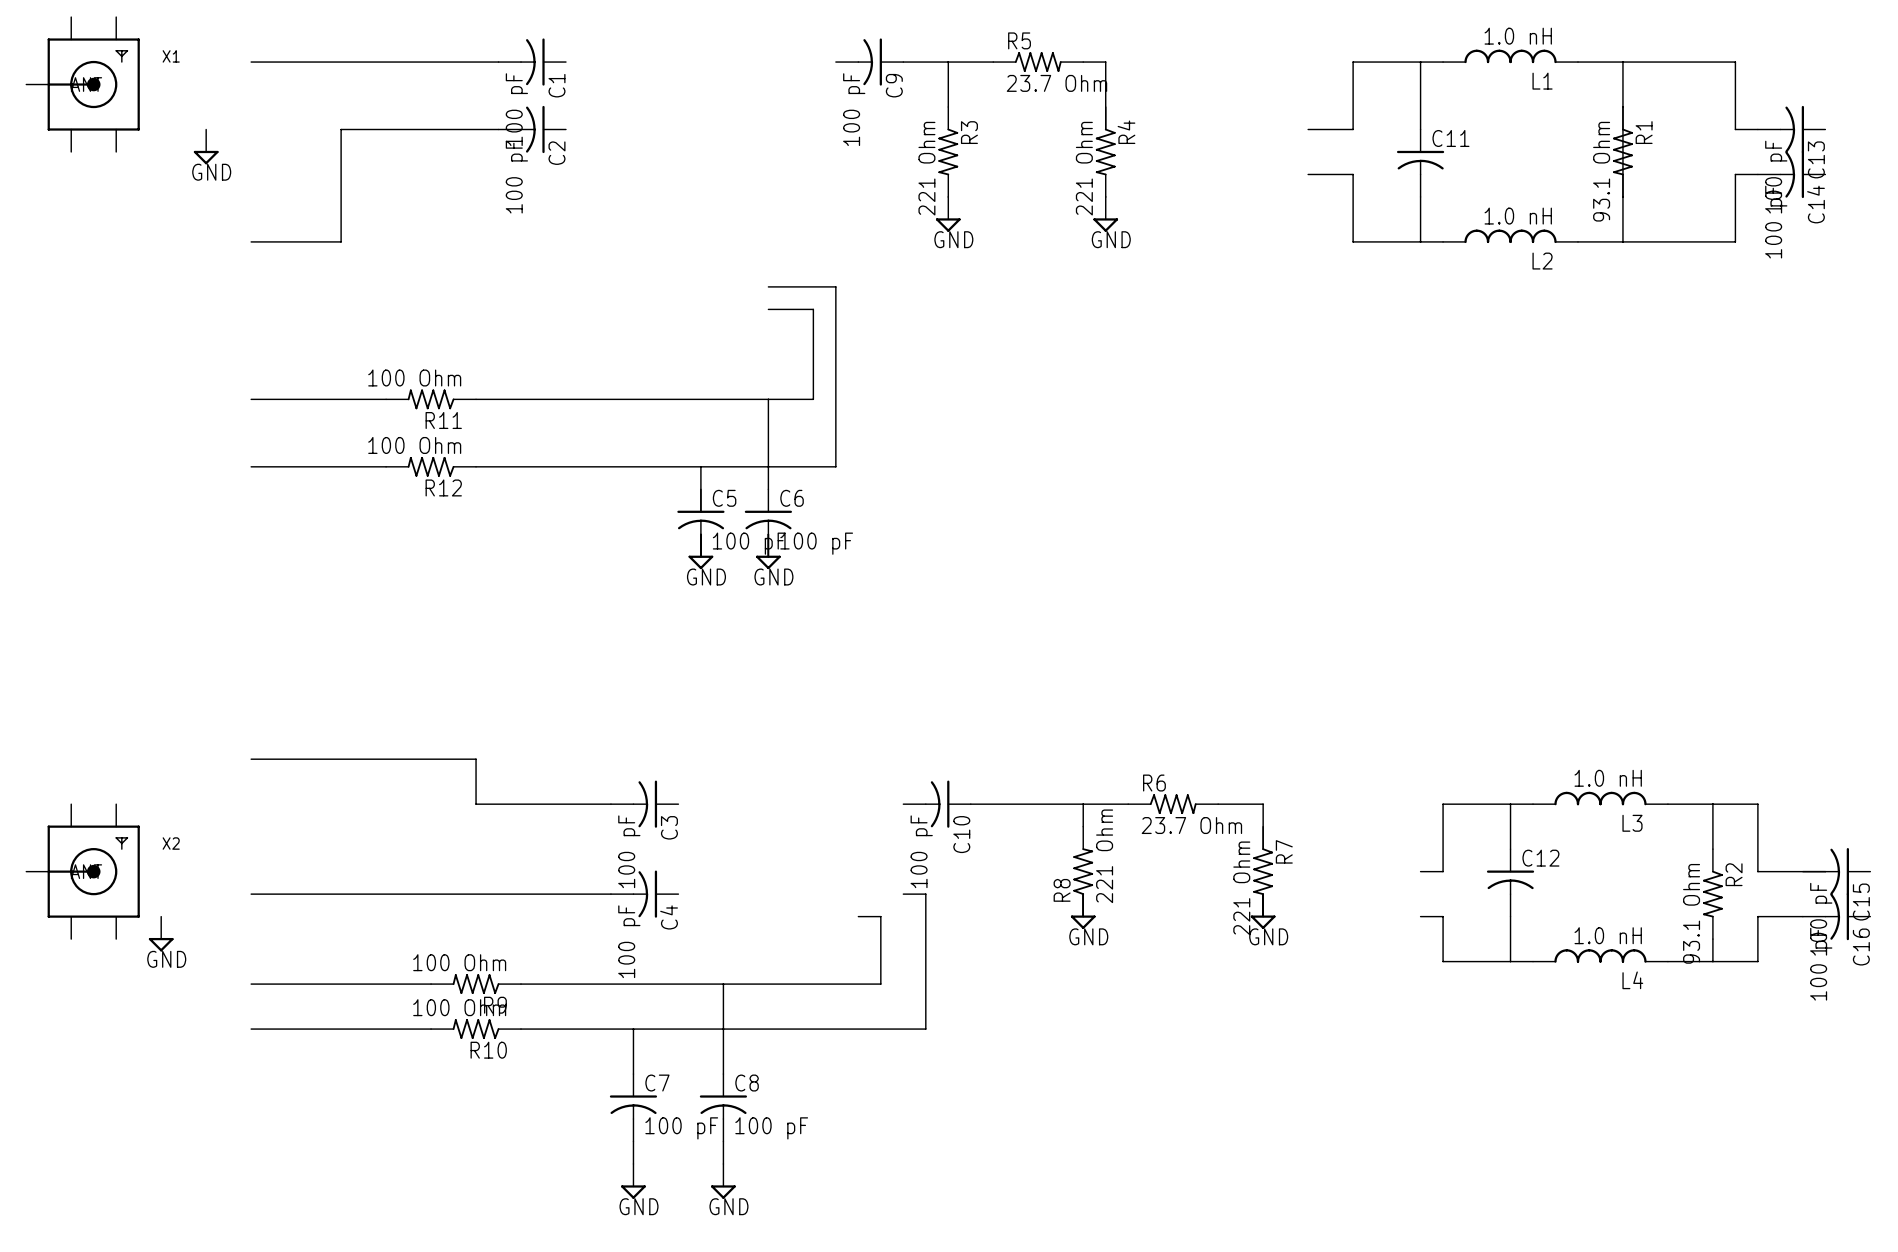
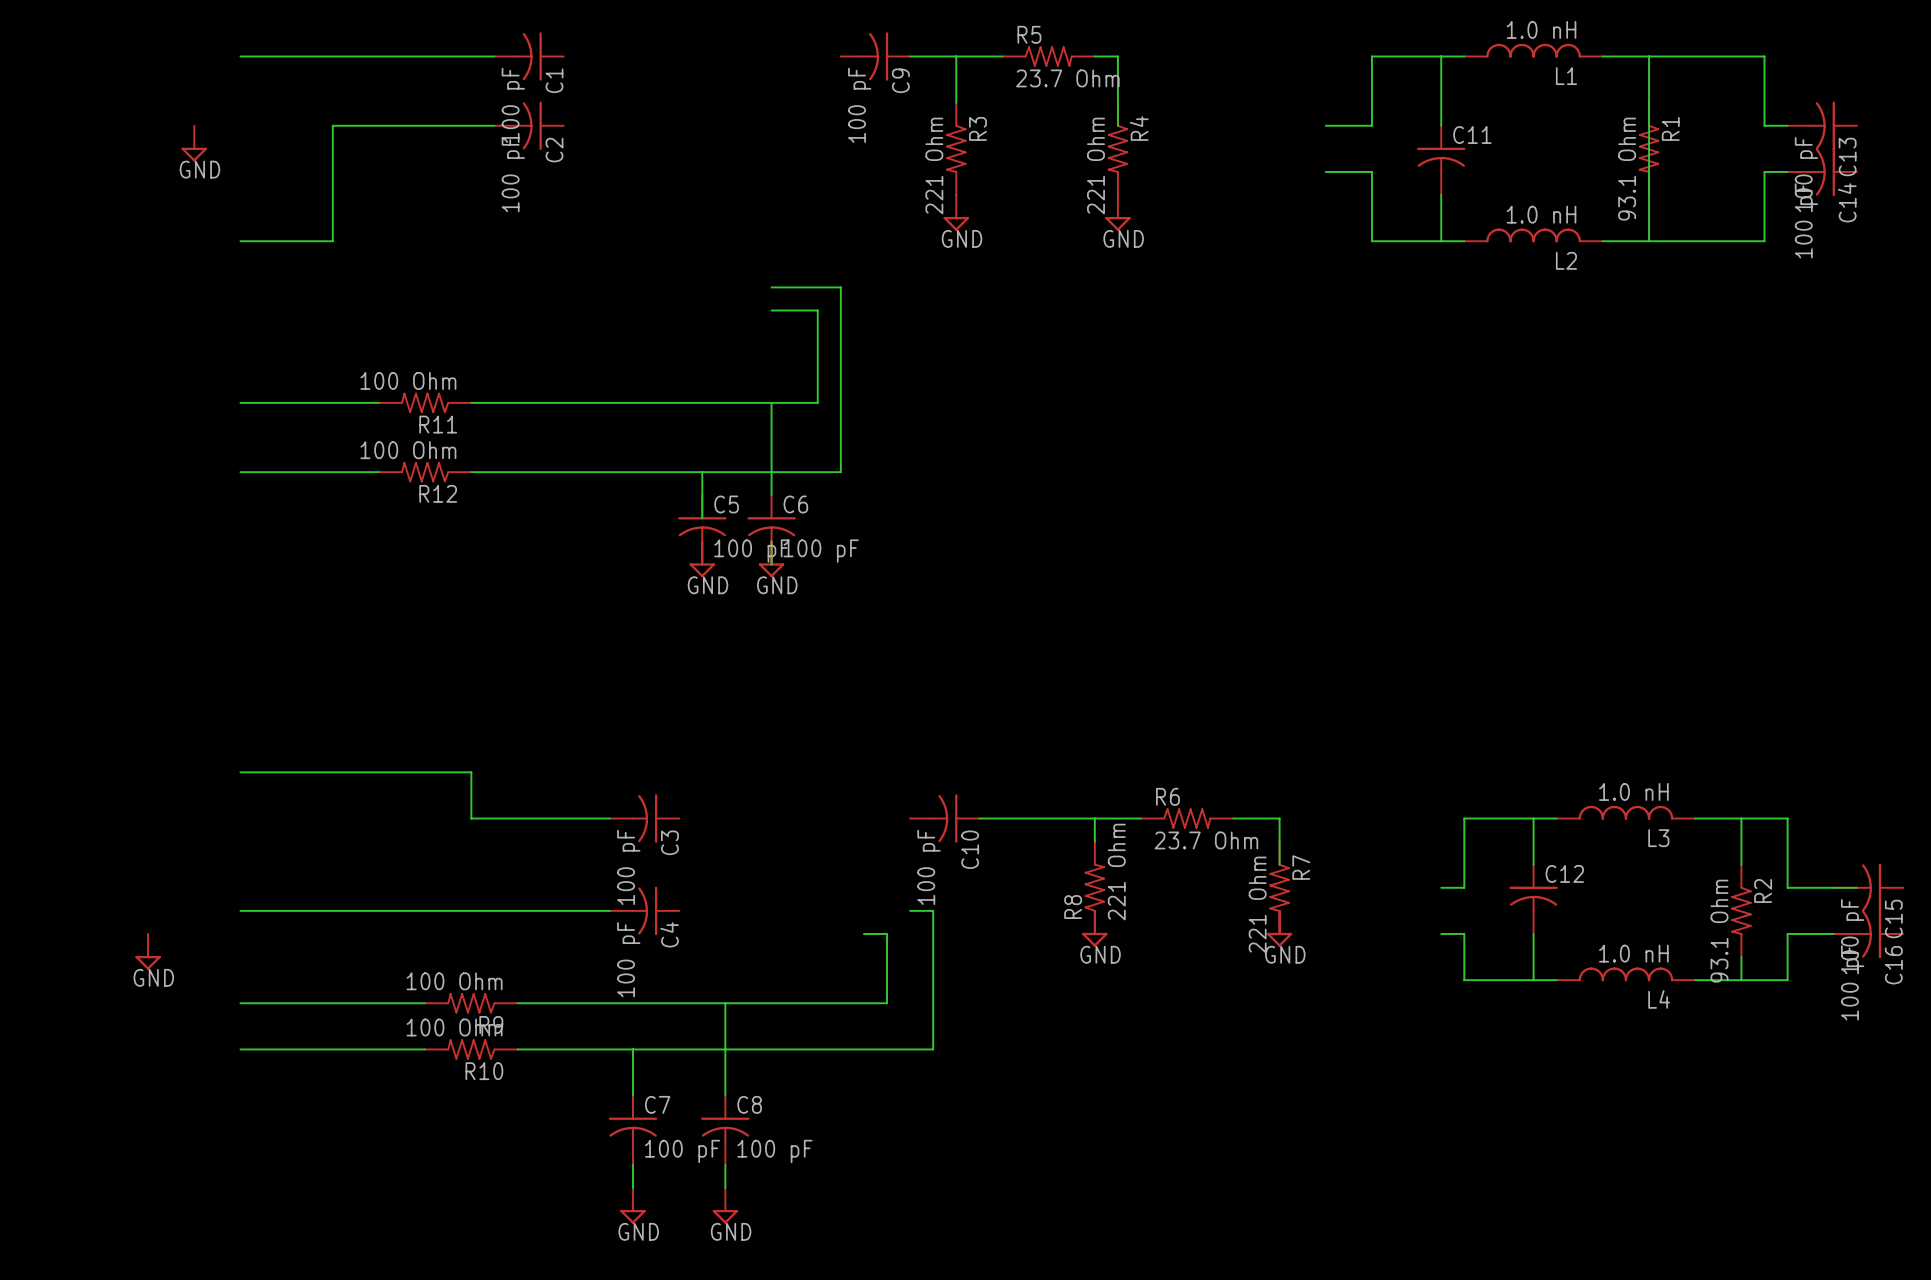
X1: (83, 84) -> none
X2: (83, 871) -> none

